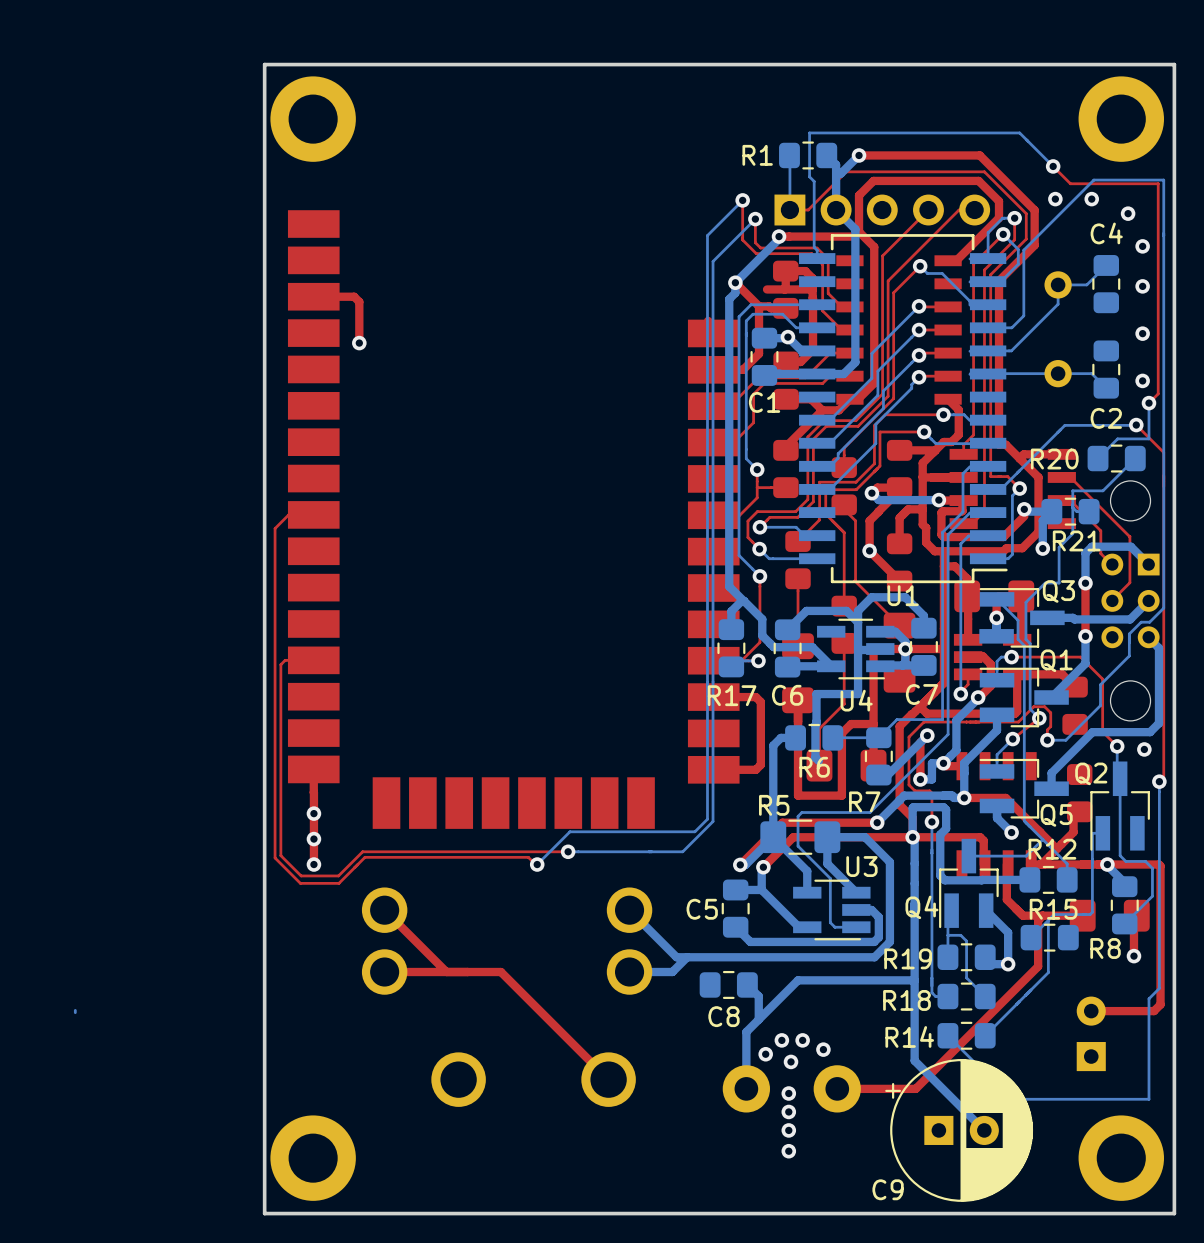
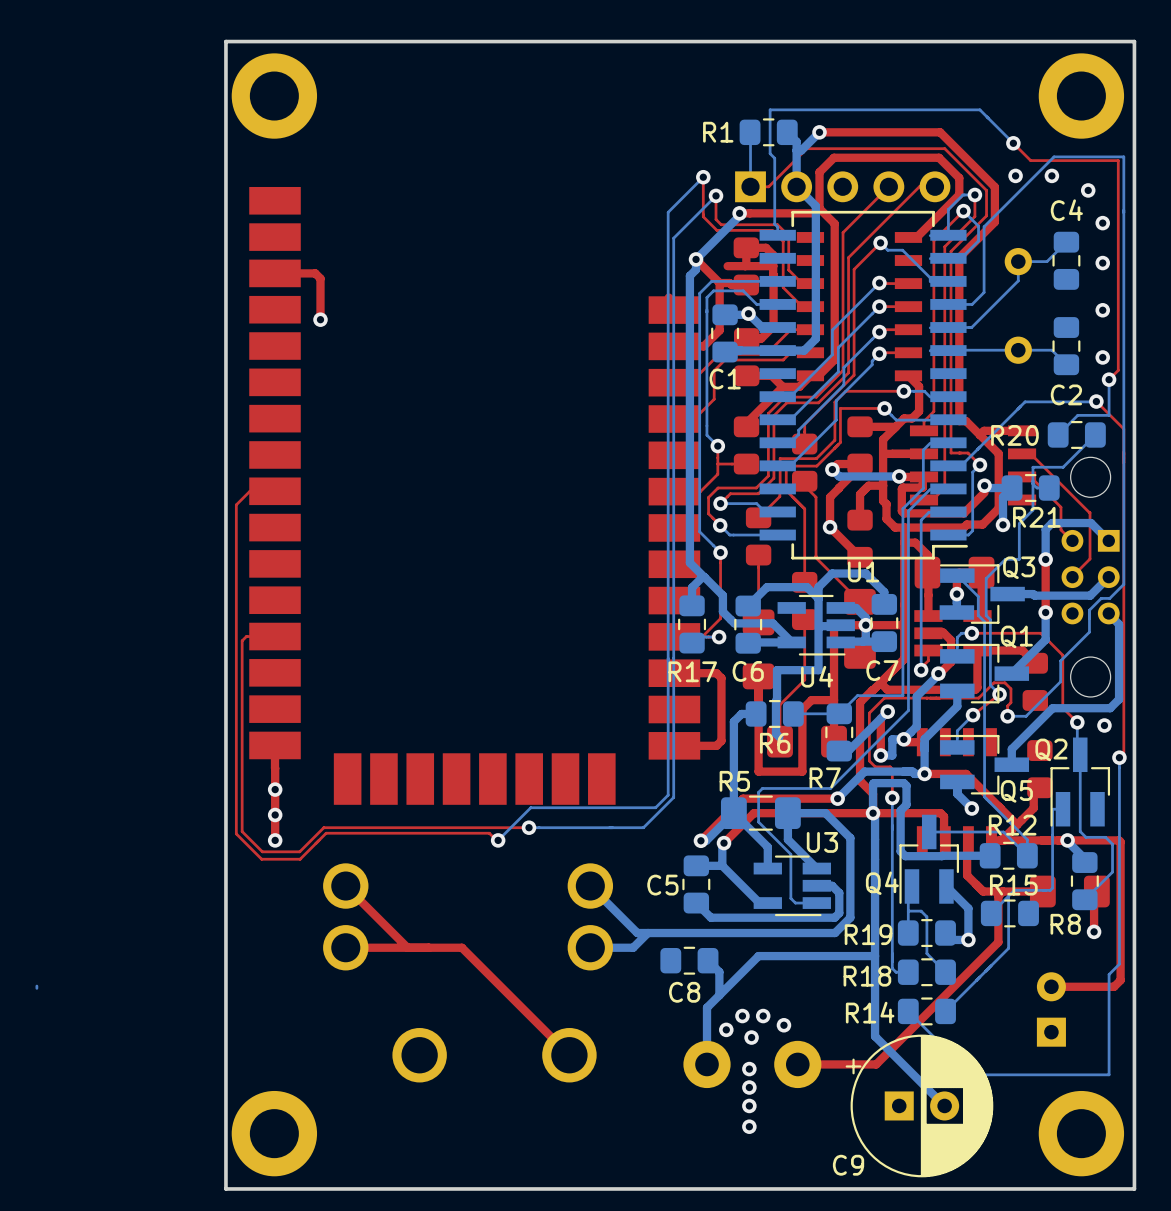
bottom track: (1042, 839) (1026, 856) -> (1027, 855) (1003, 832) (986, 832)

